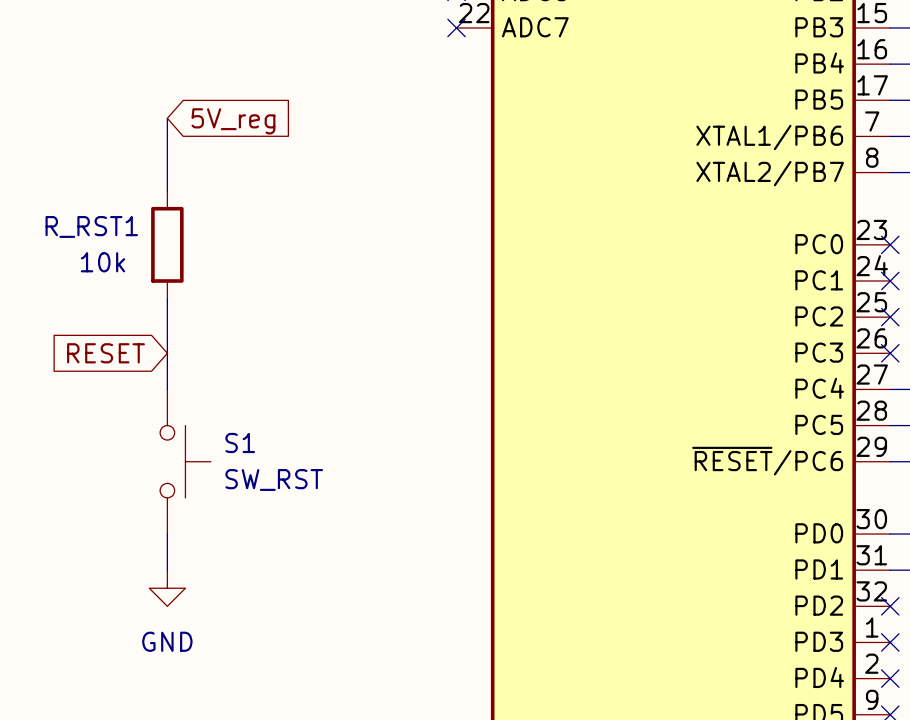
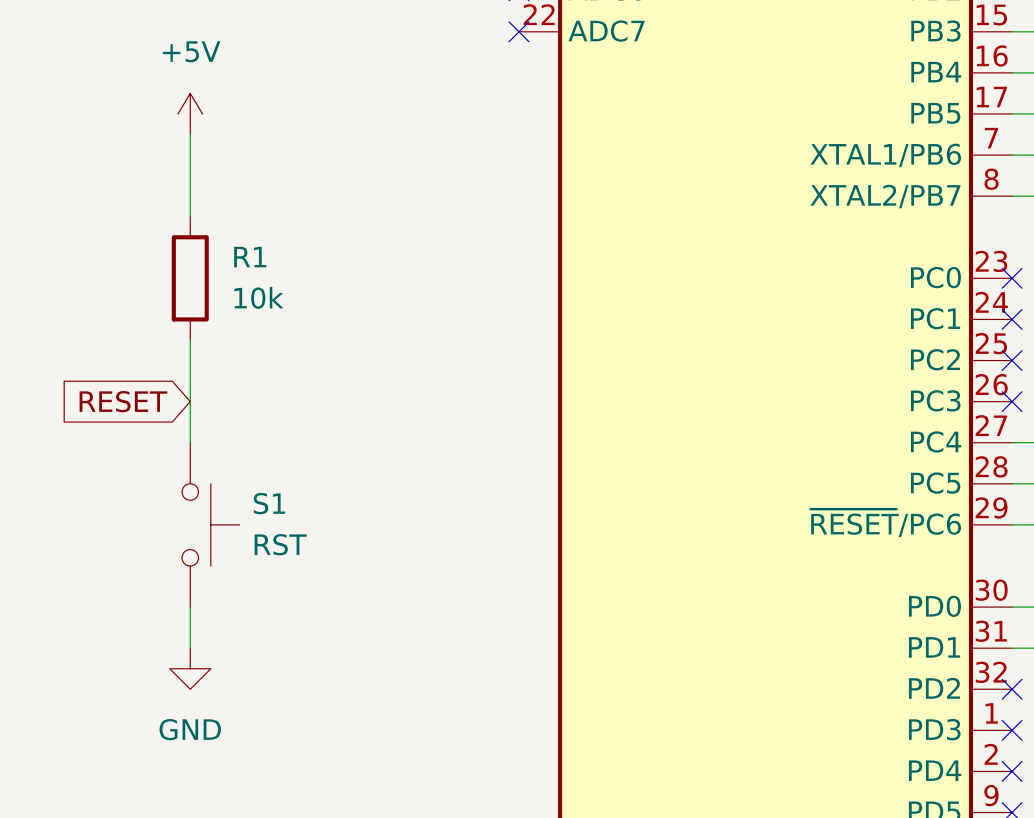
power symbol: none -> +5V (190, 113)
global label: 5V_reg (233, 121) -> none
R_RST1 name: R_RST1 (91, 226) -> R1 (250, 257)
R_RST1 value position: 10k (102, 262) -> 10k (258, 297)
S1 value: SW_RST (274, 479) -> RST (280, 544)

